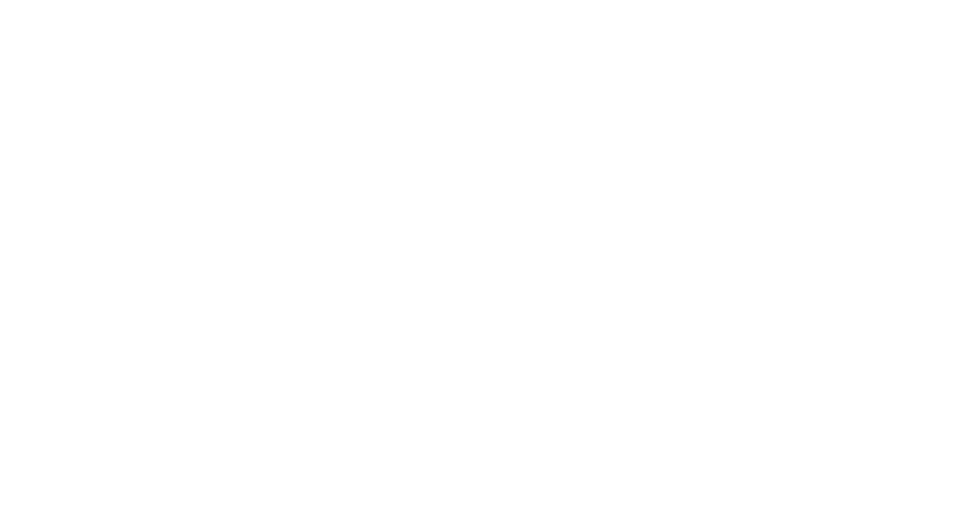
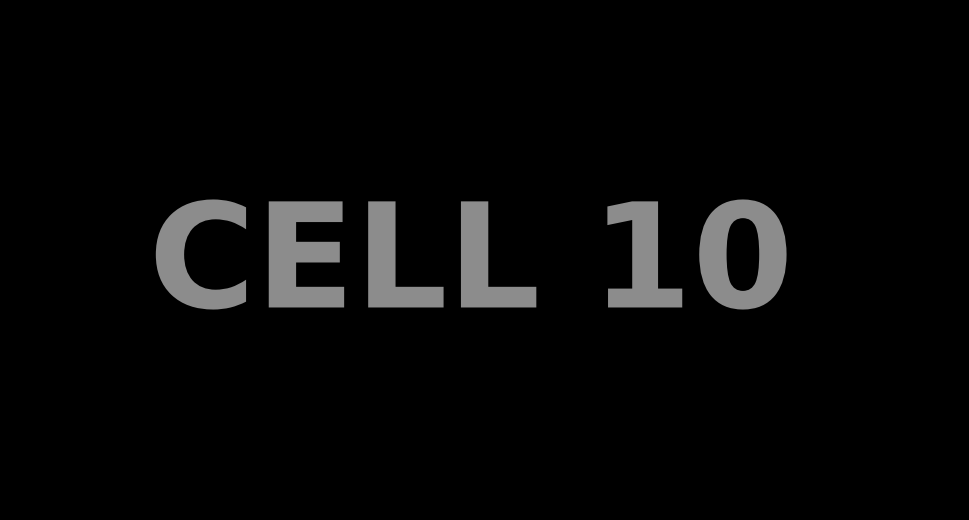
text: none -> CELL 10 (471, 254)

